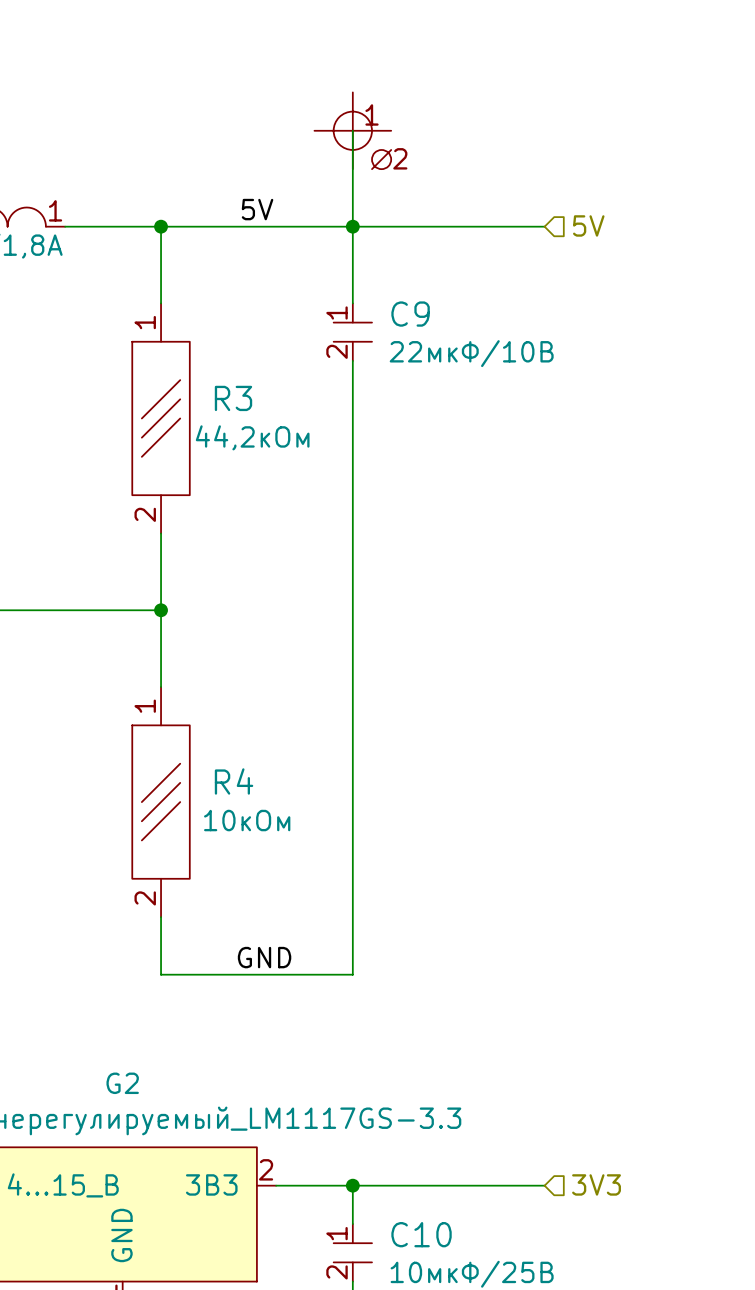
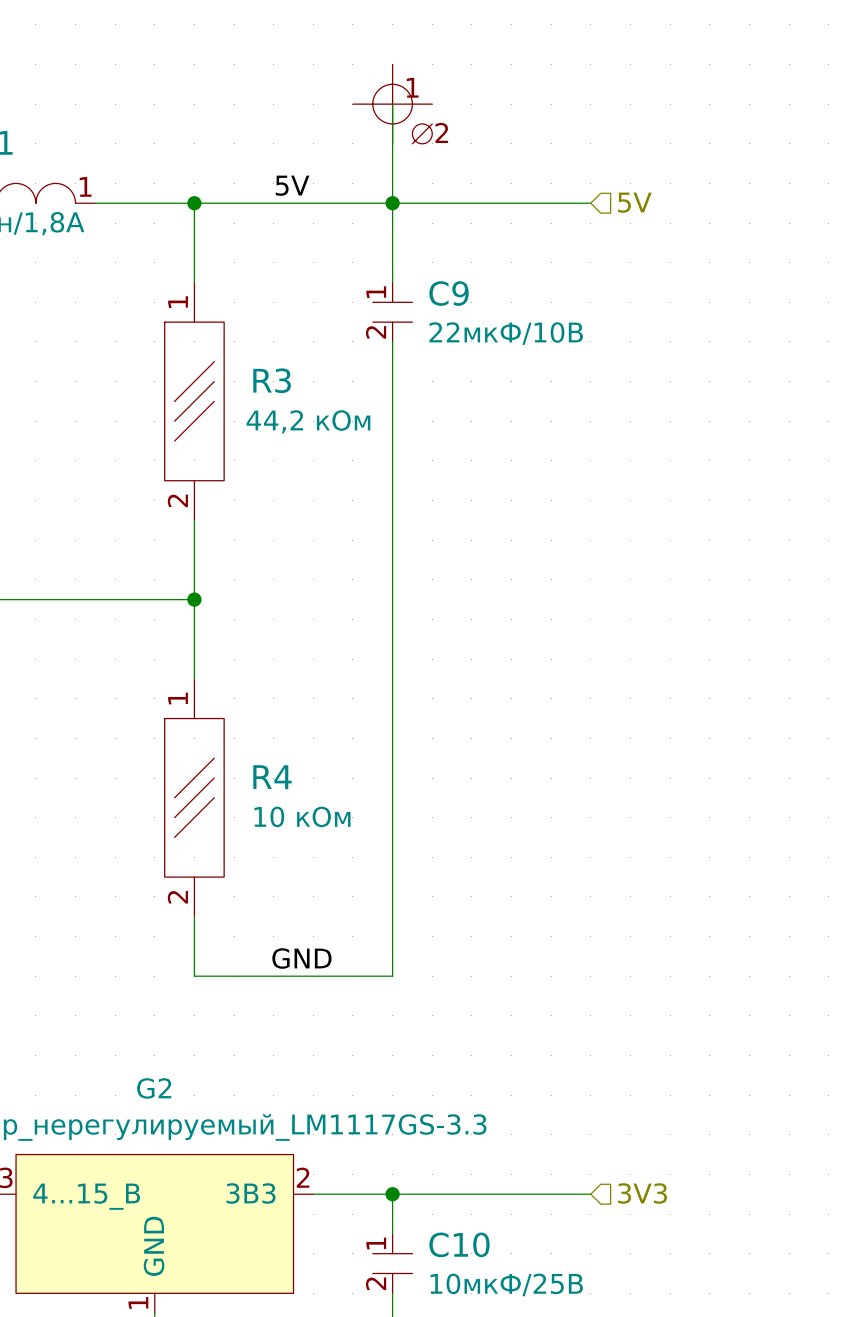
R3 text: 44,2кОм (252, 437) -> 44,2 кОм (308, 421)
R4 text: 10кОм (247, 820) -> 10 кОм (302, 816)

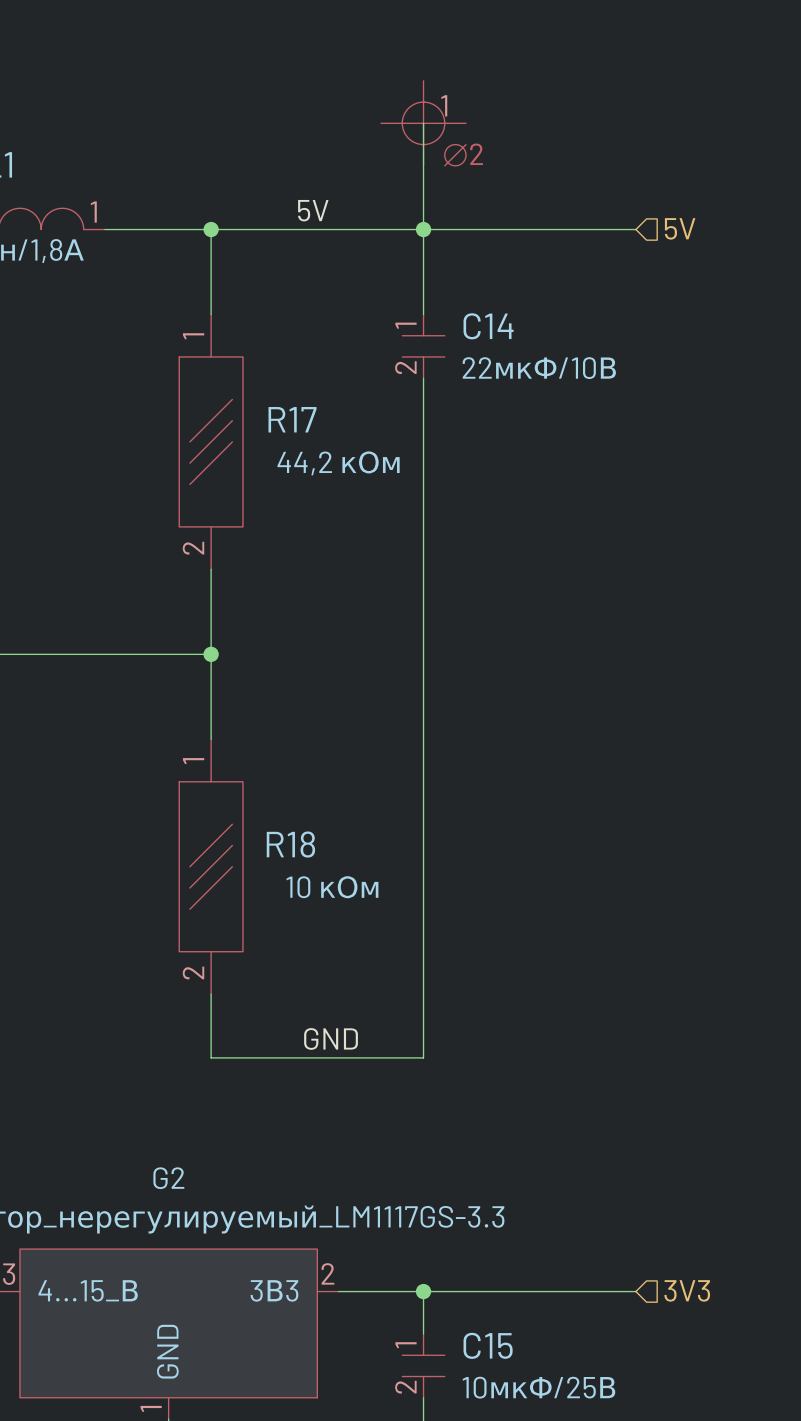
C9 name: C9 (449, 293) -> C14 (488, 326)
R3 name: R3 (272, 380) -> R17 (292, 419)
R4 name: R4 (272, 777) -> R18 (290, 844)
C10 name: C10 (459, 1244) -> C15 (488, 1345)

